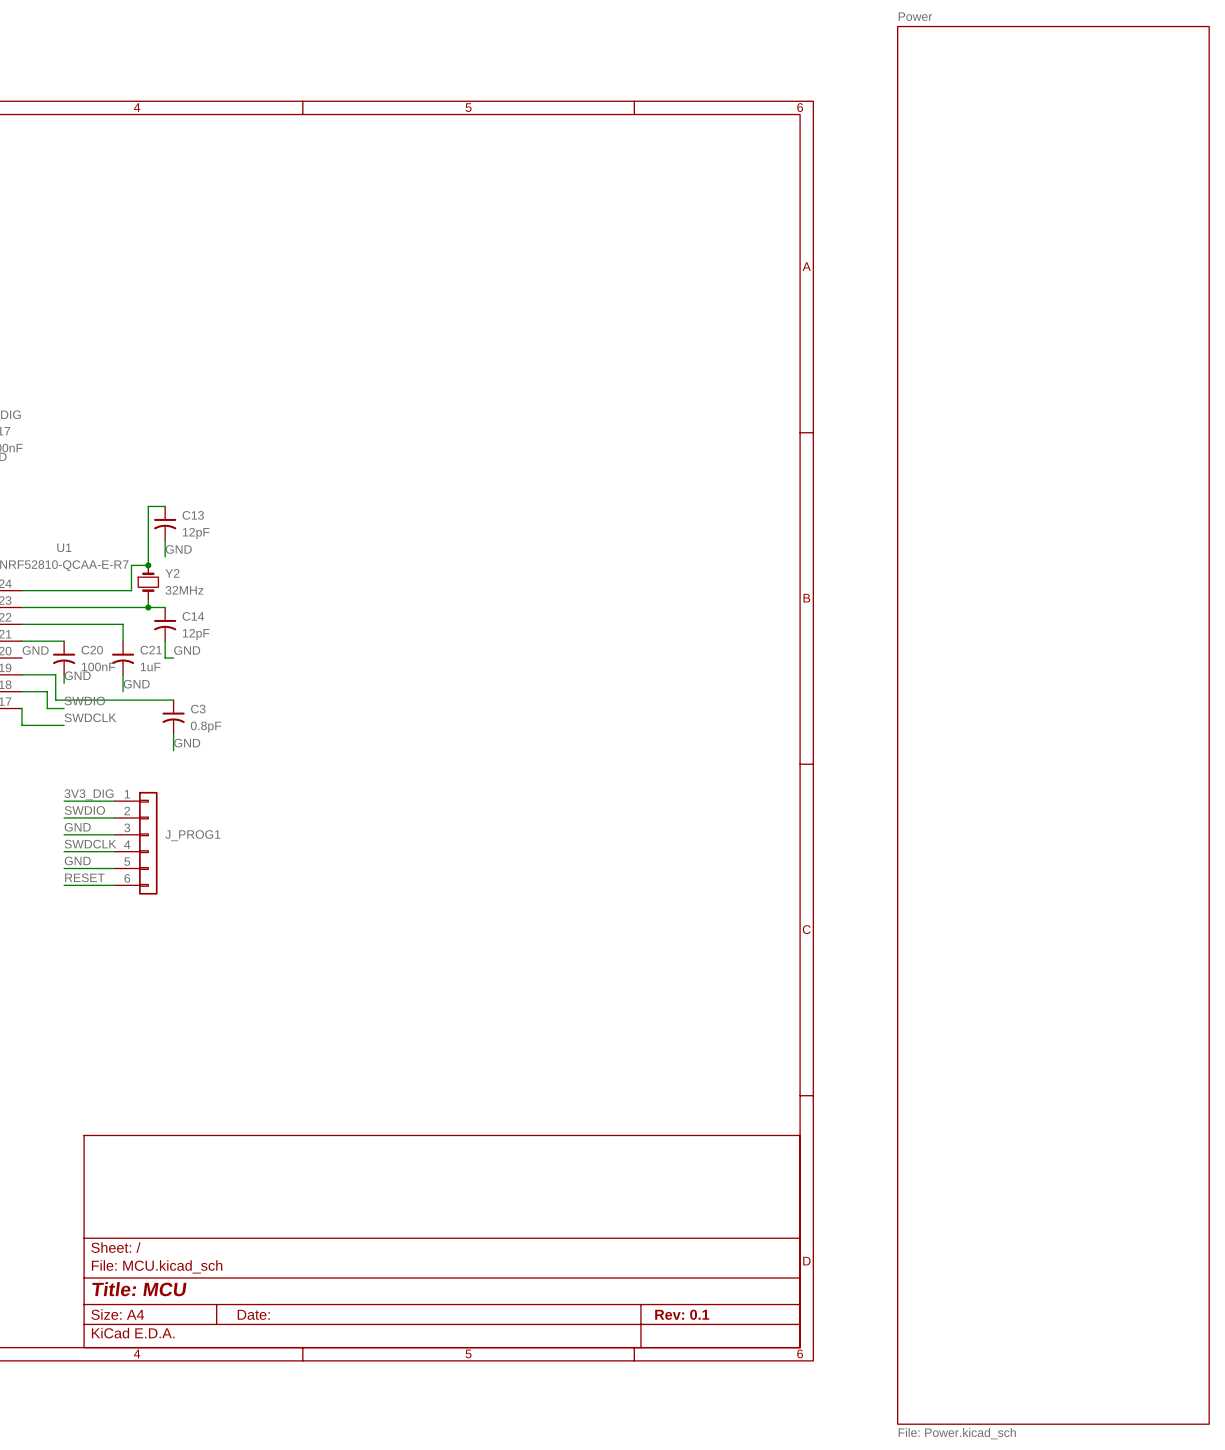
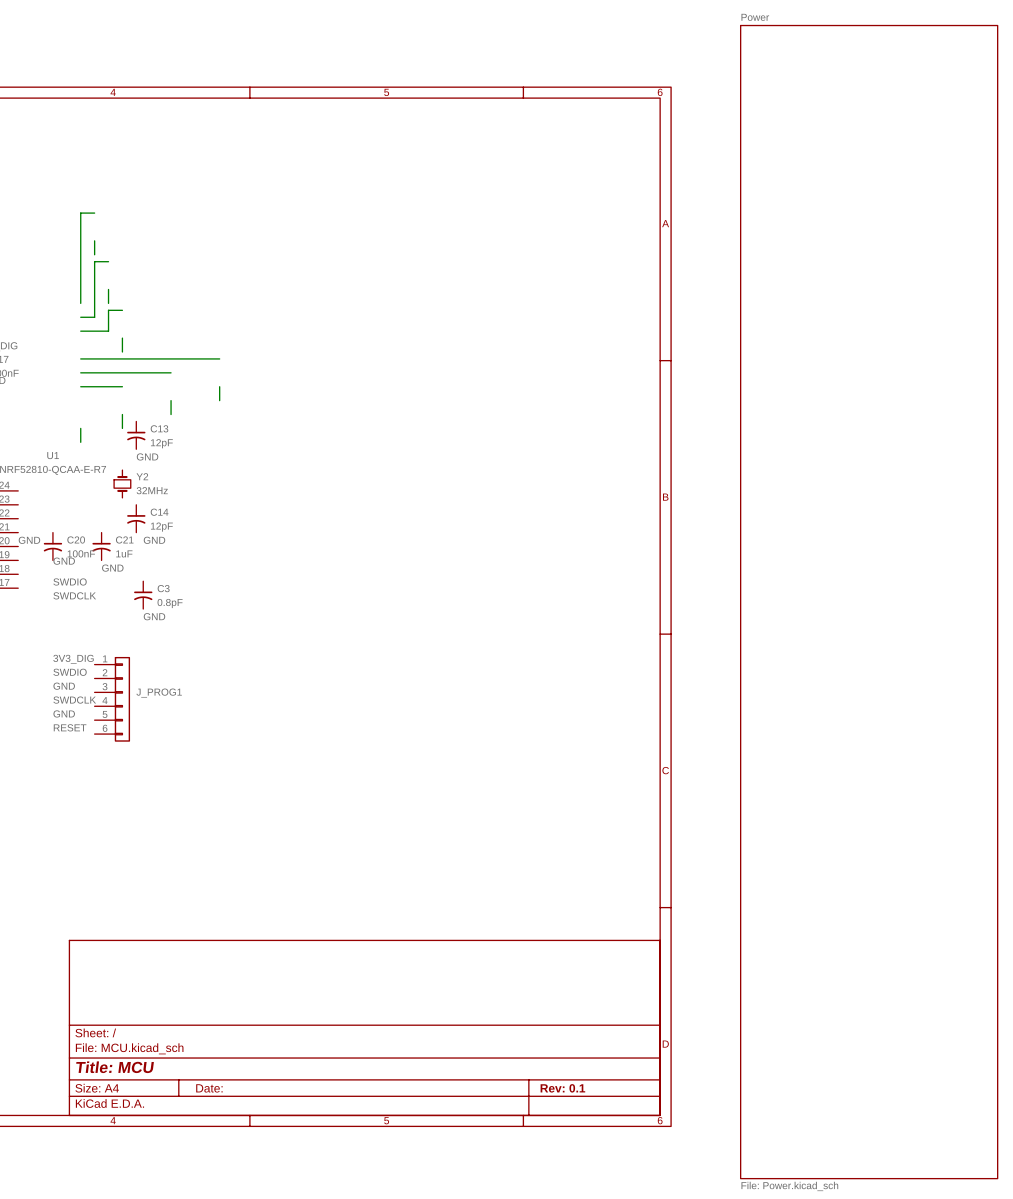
wire: none -> (94, 213) (80, 213) (80, 303)
wire: none -> (94, 240) (94, 254)
wire: none -> (108, 261) (94, 261) (94, 317) (80, 317)
wire: none -> (108, 289) (108, 303)
wire: none -> (122, 310) (108, 310) (108, 331) (80, 331)
wire: none -> (122, 338) (122, 352)
wire: none -> (80, 358) (219, 358)
wire: none -> (80, 372) (171, 372)
wire: none -> (80, 386) (122, 386)
wire: none -> (219, 386) (219, 400)
wire: none -> (171, 400) (171, 414)
wire: (148, 506) (165, 506) -> (122, 421) (122, 414)
wire: (148, 514) (148, 565) (131, 565) (131, 590) (22, 590) -> none
wire: (165, 540) (165, 556) -> (80, 428) (80, 442)
junction: (148, 565) -> none
wire: (148, 599) (148, 607) -> none
wire: (22, 607) (165, 607) -> none
junction: (148, 607) -> none
wire: (22, 624) (123, 624) (123, 641) -> none
wire: (22, 641) (64, 641) -> none
wire: (165, 641) (165, 658) (173, 658) -> none
wire: (22, 674) (55, 674) (55, 700) (173, 700) -> none
wire: (64, 674) (64, 683) -> none
wire: (123, 674) (123, 691) -> none
wire: (22, 691) (47, 691) (47, 708) (64, 708) -> none
wire: (22, 708) (22, 725) (64, 725) -> none
wire: (173, 733) (173, 750) -> none
wire: (64, 801) (114, 801) -> none
wire: (64, 817) (114, 817) -> none
wire: (64, 834) (114, 834) -> none
wire: (64, 851) (114, 851) -> none
wire: (64, 868) (114, 868) -> none
wire: (64, 885) (114, 885) -> none

